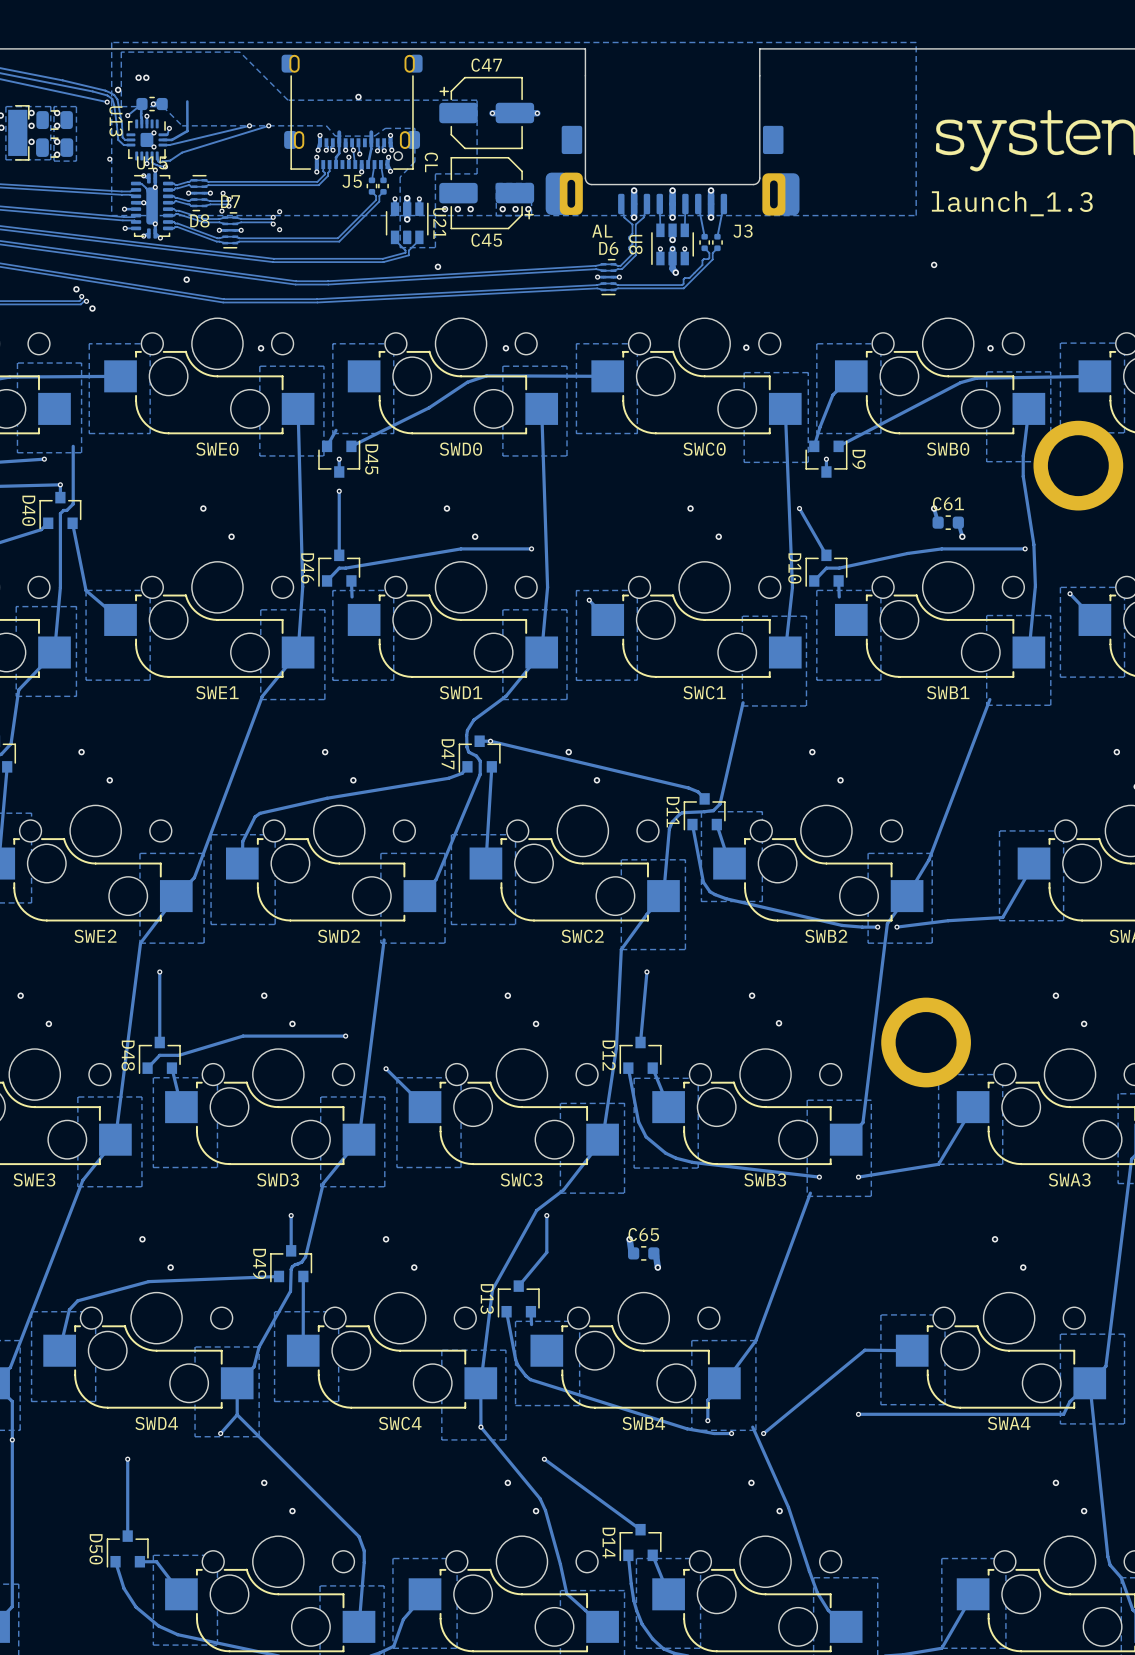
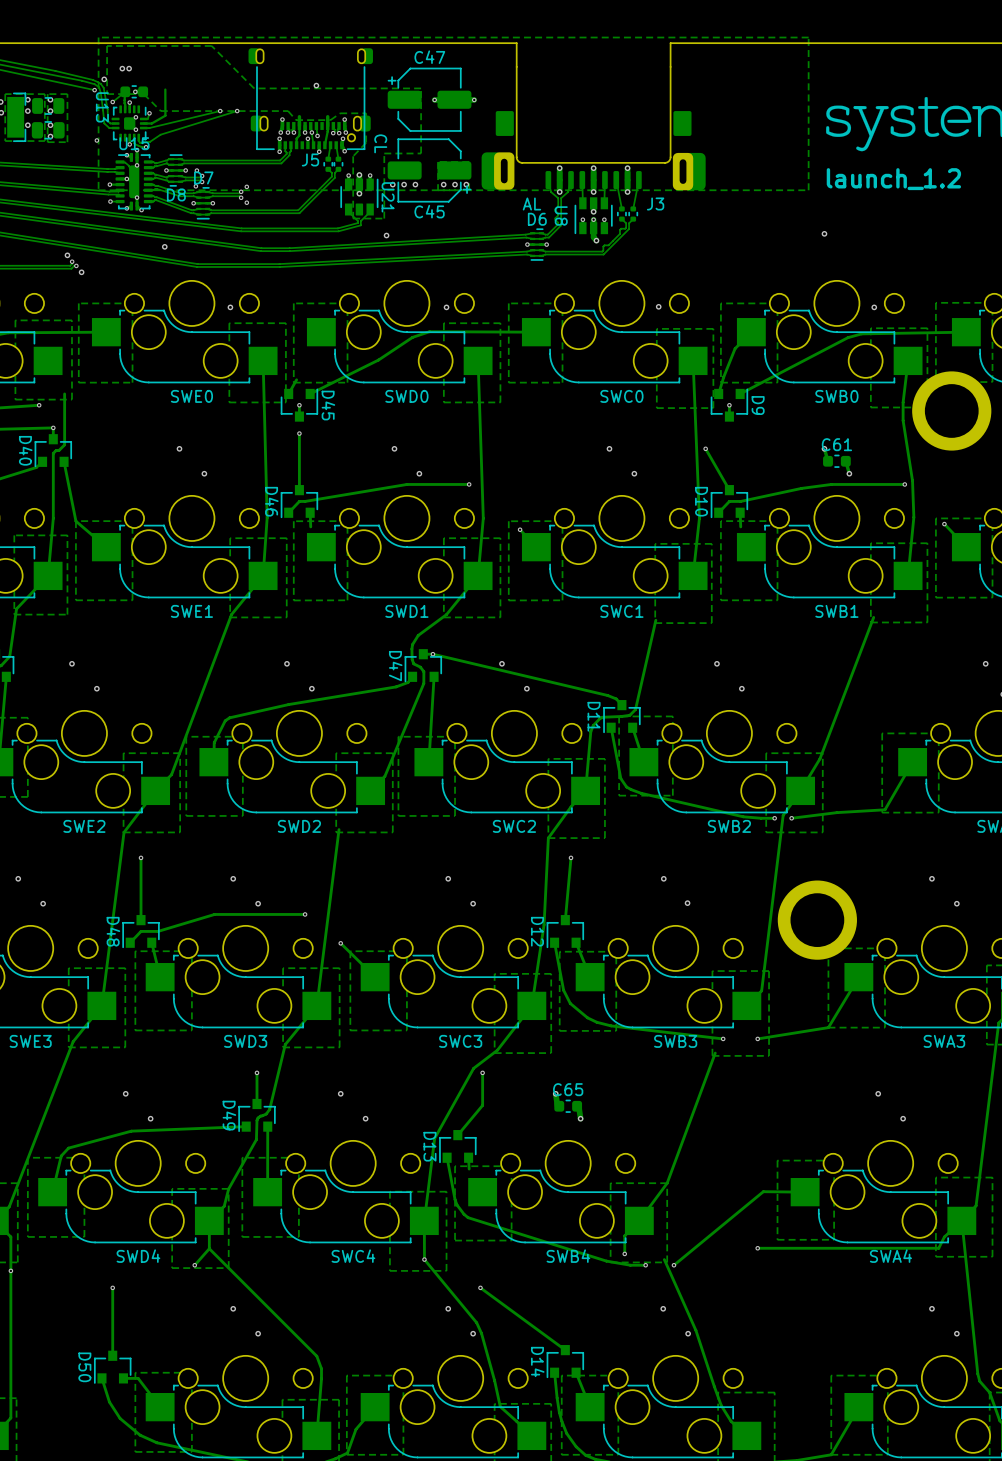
text: launch_1.3 (1012, 203) -> launch_1.2 (893, 179)

